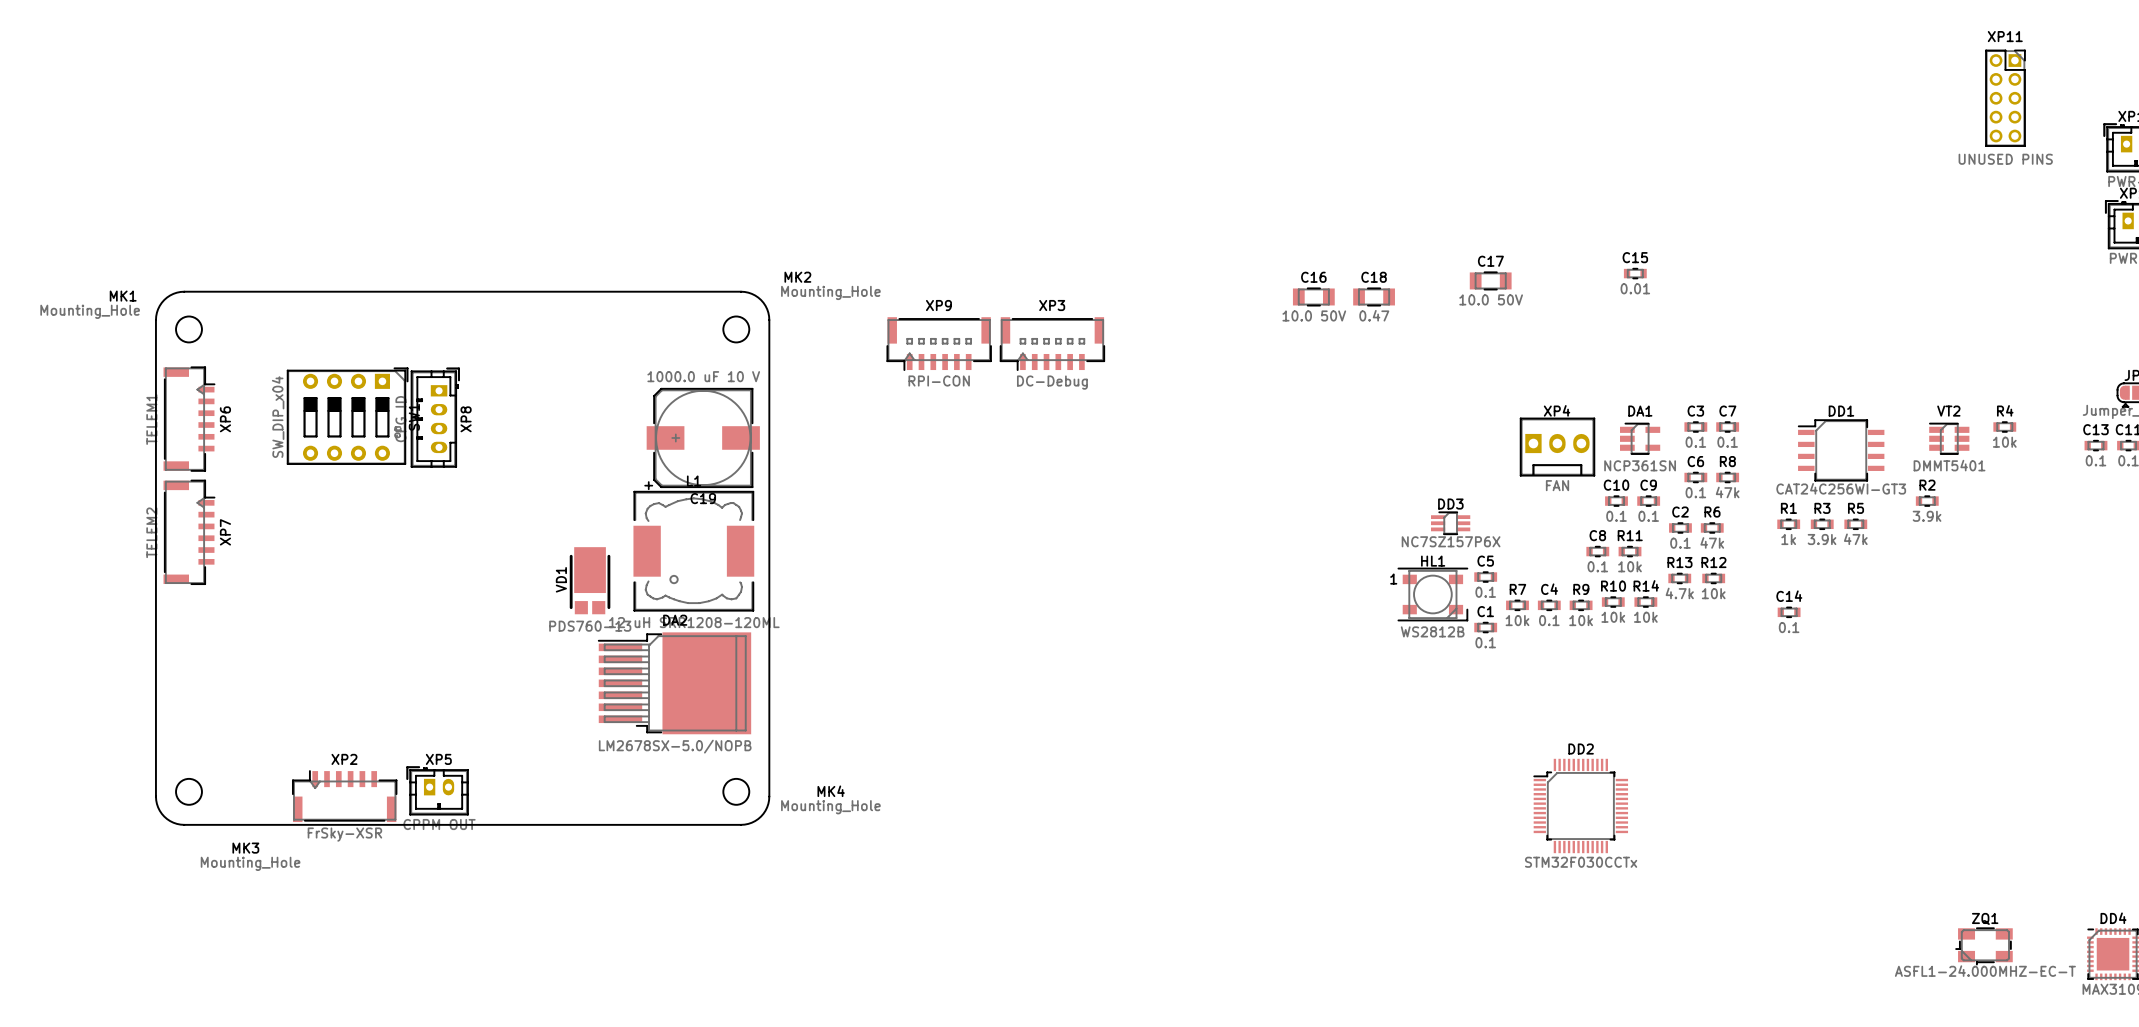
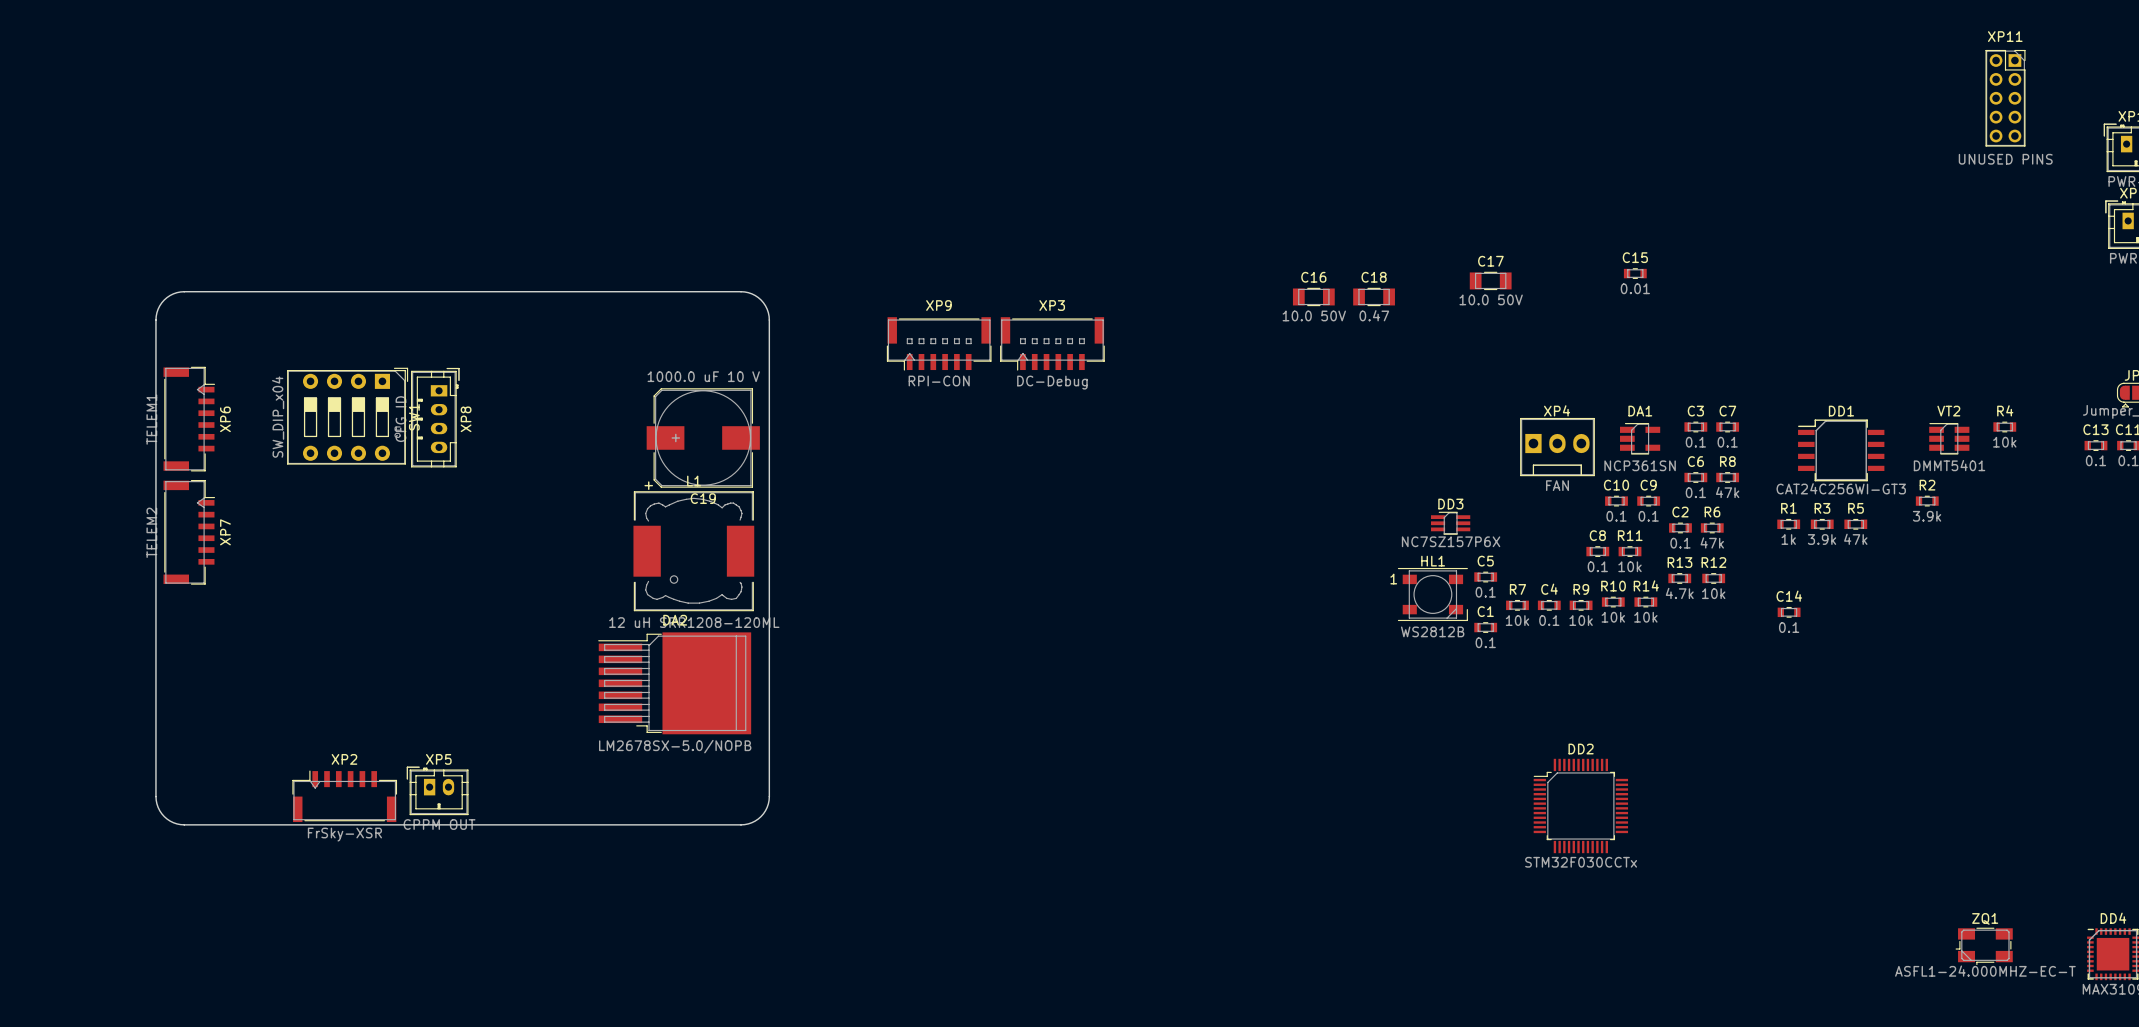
MK1: Mounting_Hole (188, 329) -> none
MK2: Mounting_Hole (736, 329) -> none
VD1: PDS760-13 (590, 580) -> none
MK3: Mounting_Hole (188, 791) -> none
MK4: Mounting_Hole (736, 791) -> none

